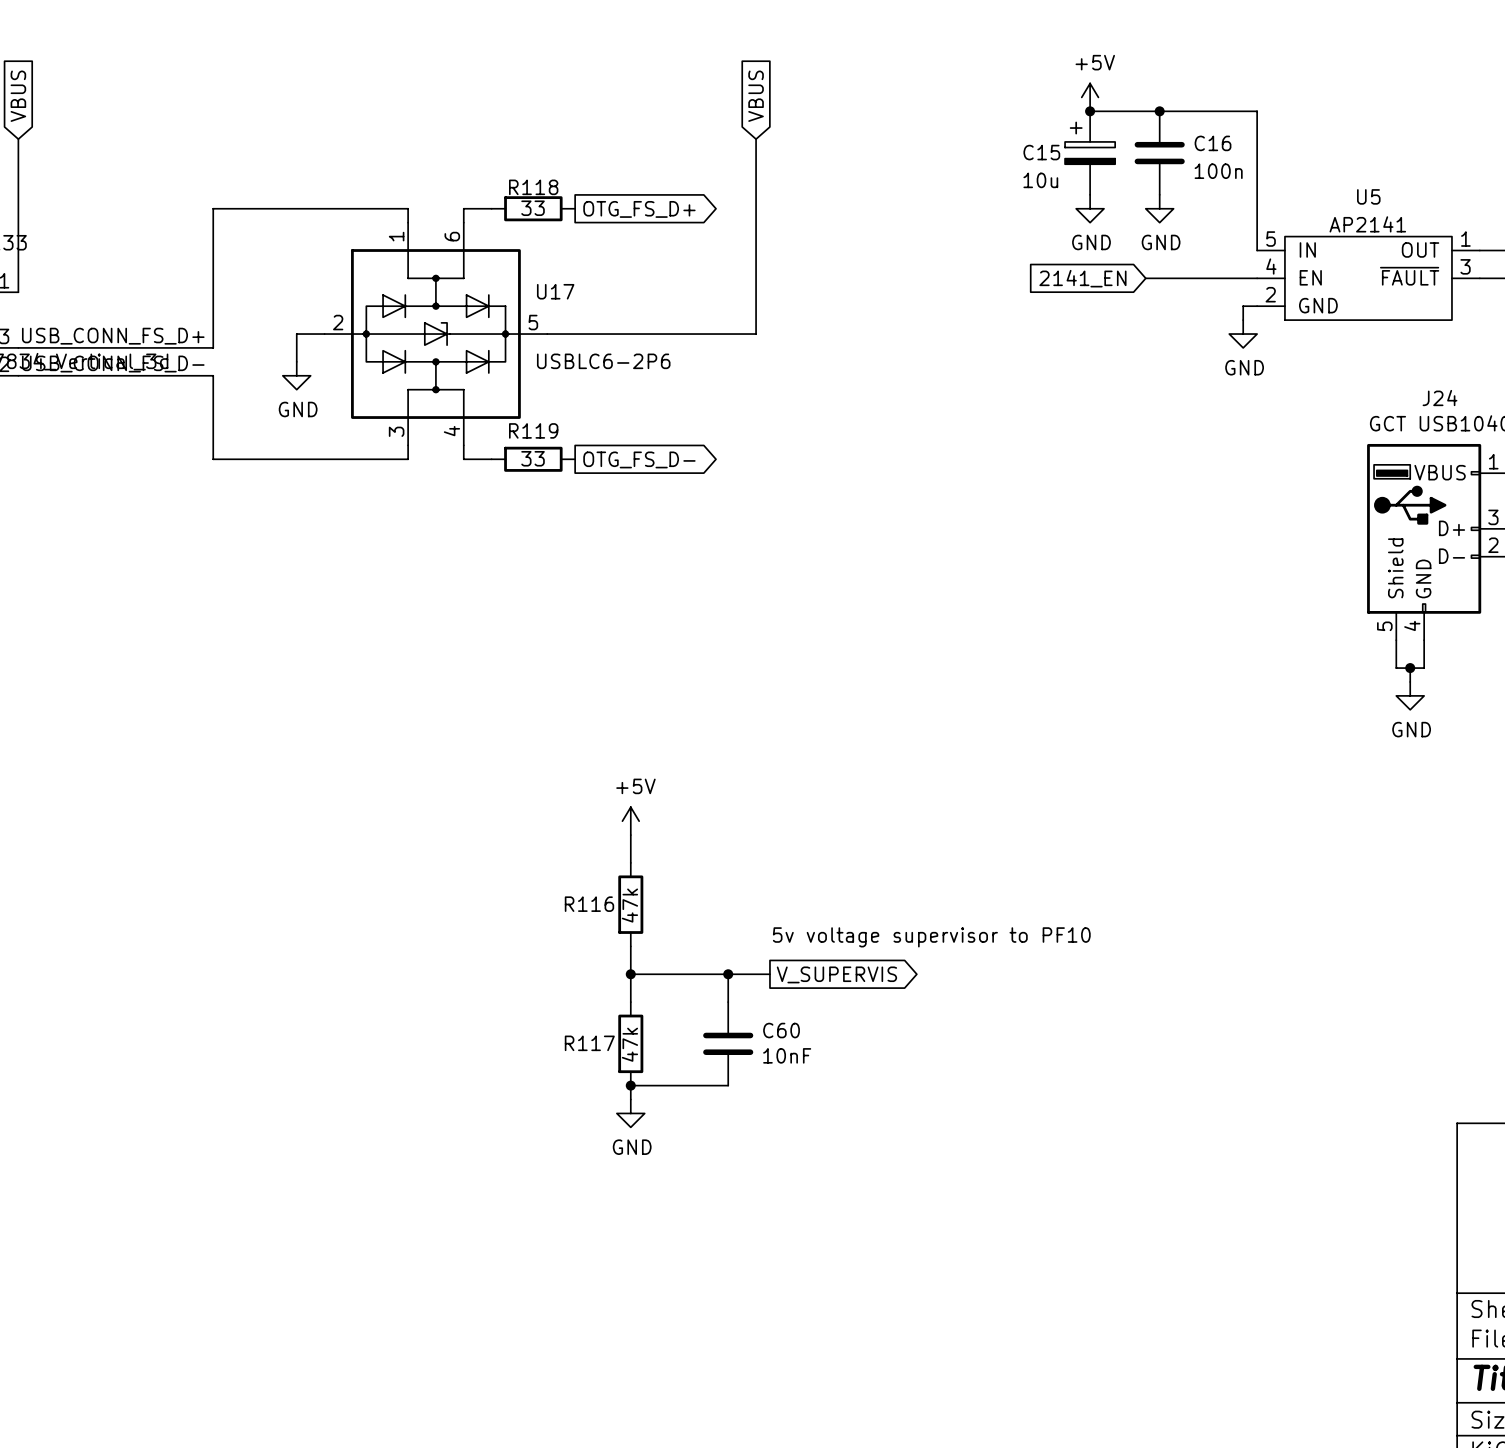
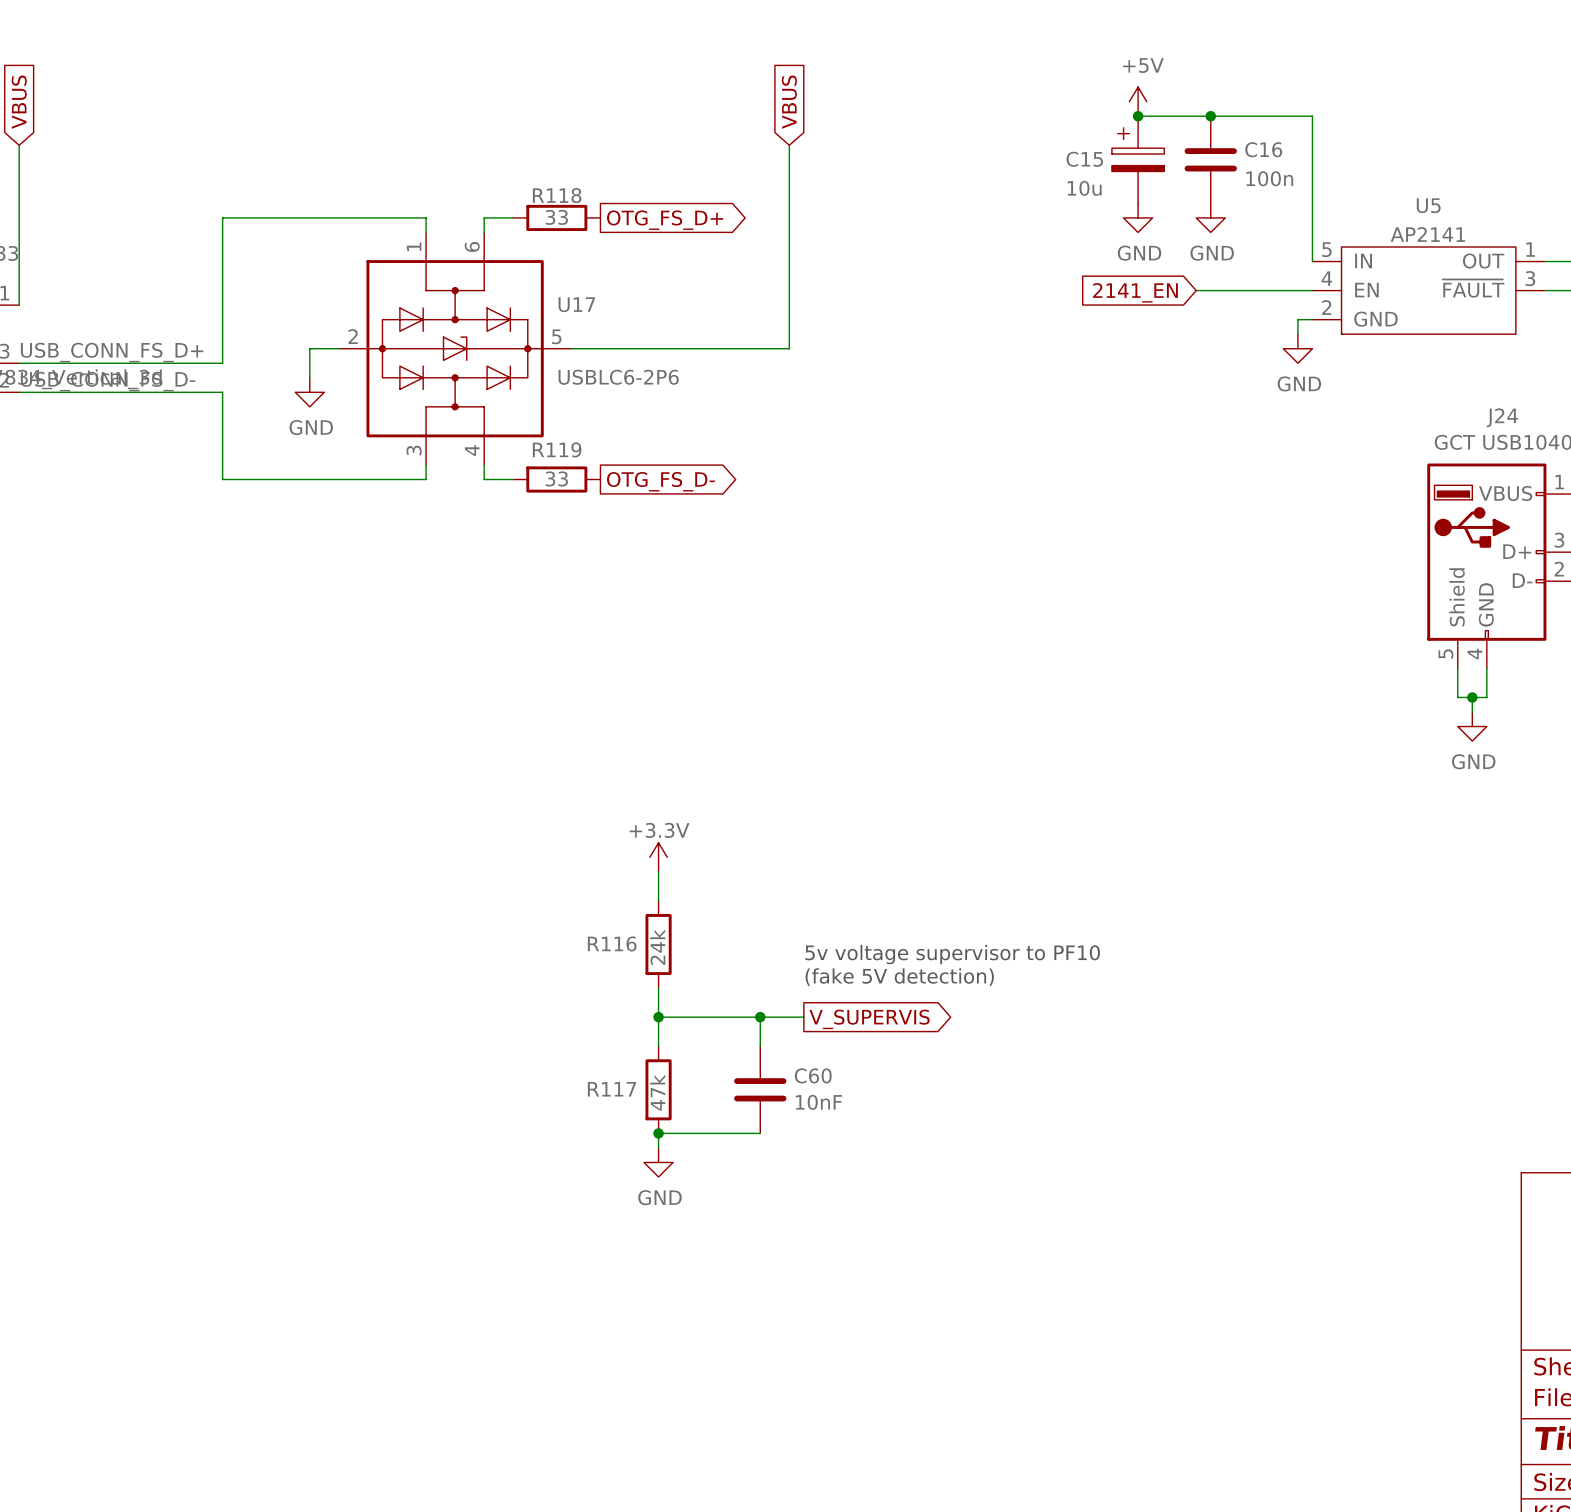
power symbol: +5V (630, 821) -> +3.3V (658, 857)
R116 value: 47k (629, 905) -> 24k (657, 947)
text: none -> 5v voltage supervisor to PF10 (952, 954)
text: 5v voltage supervisor to PF10 (931, 937) -> (fake 5V detection) (899, 977)

